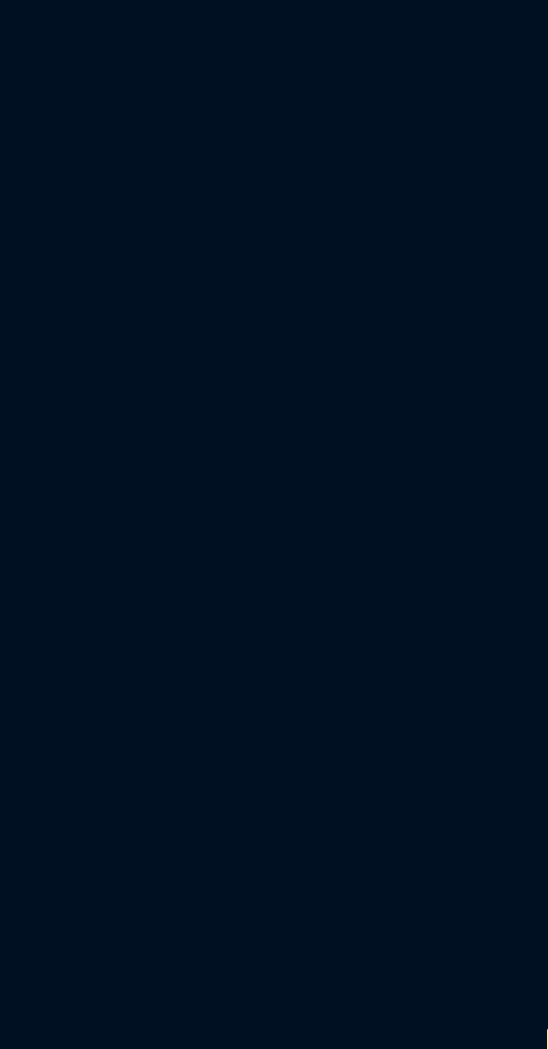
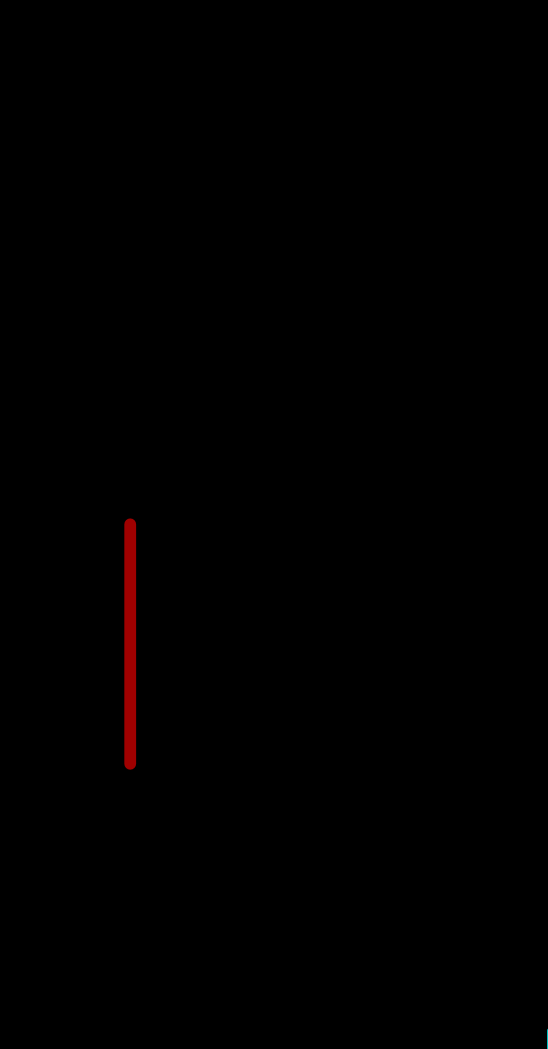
track: none -> (130, 524) (130, 763)

